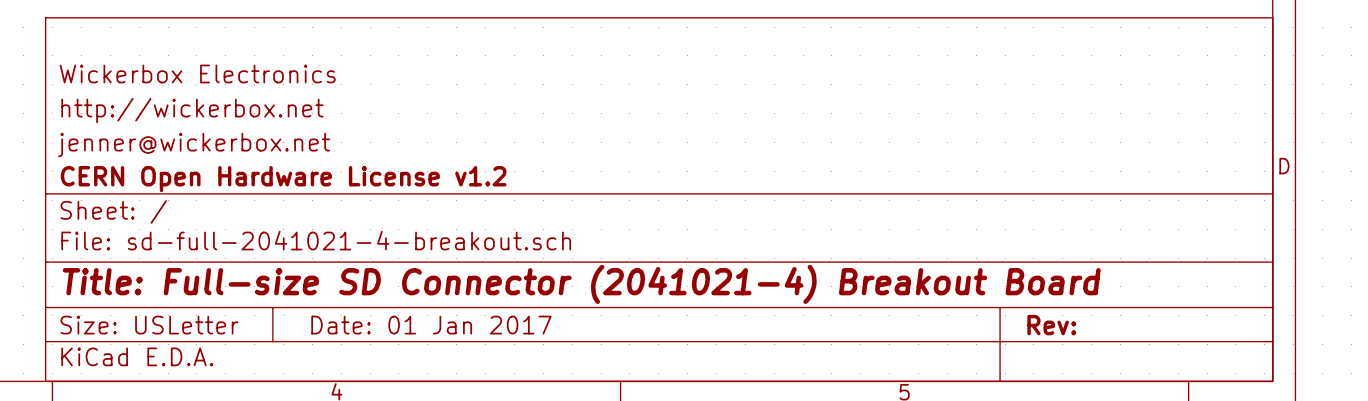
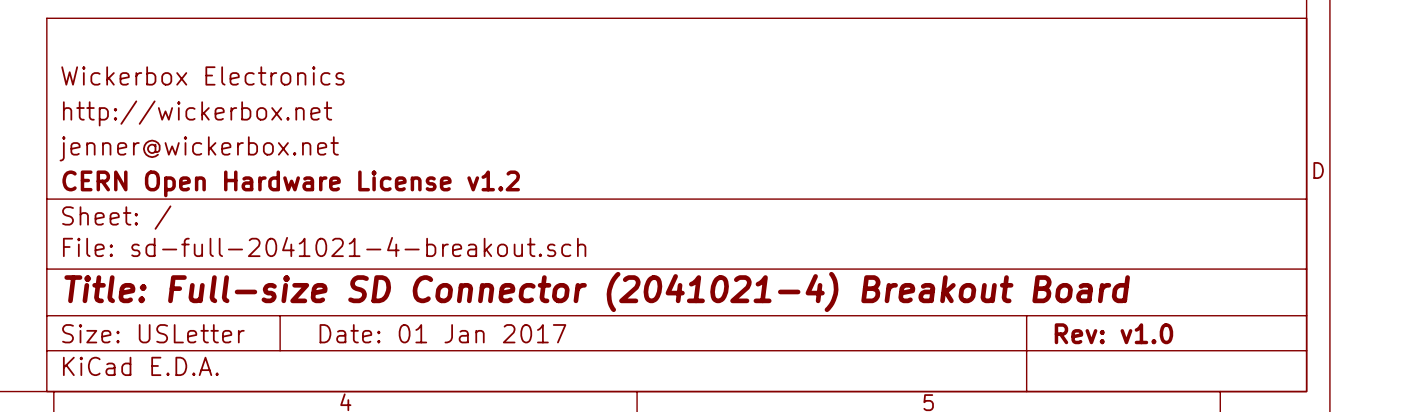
title block: Rev: (1051, 325) -> Rev: v1.0 (1113, 333)

